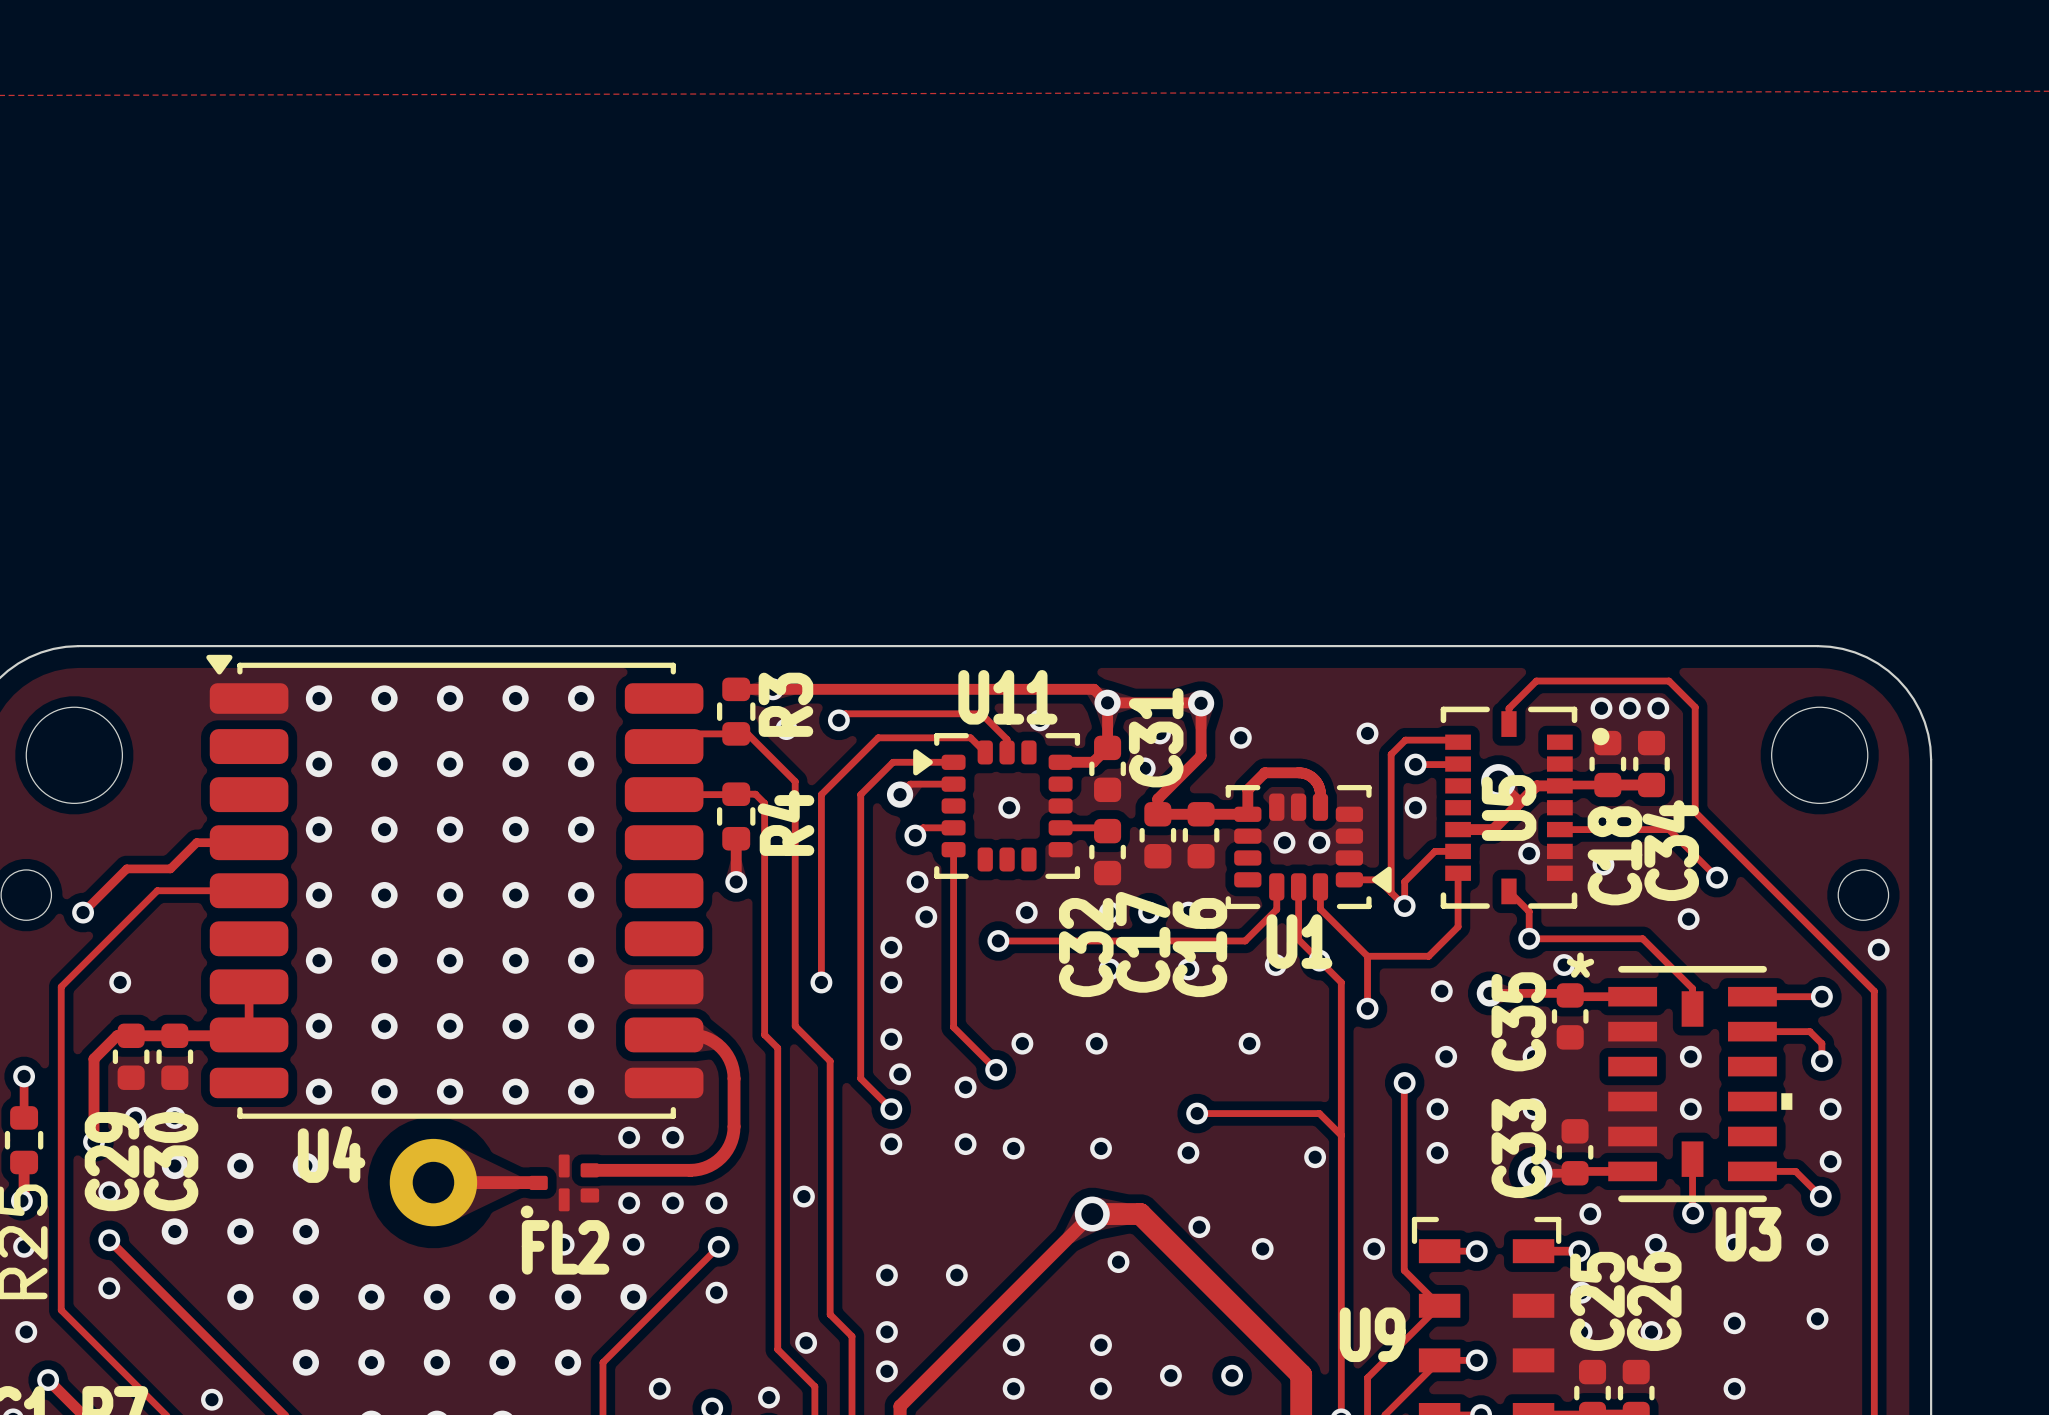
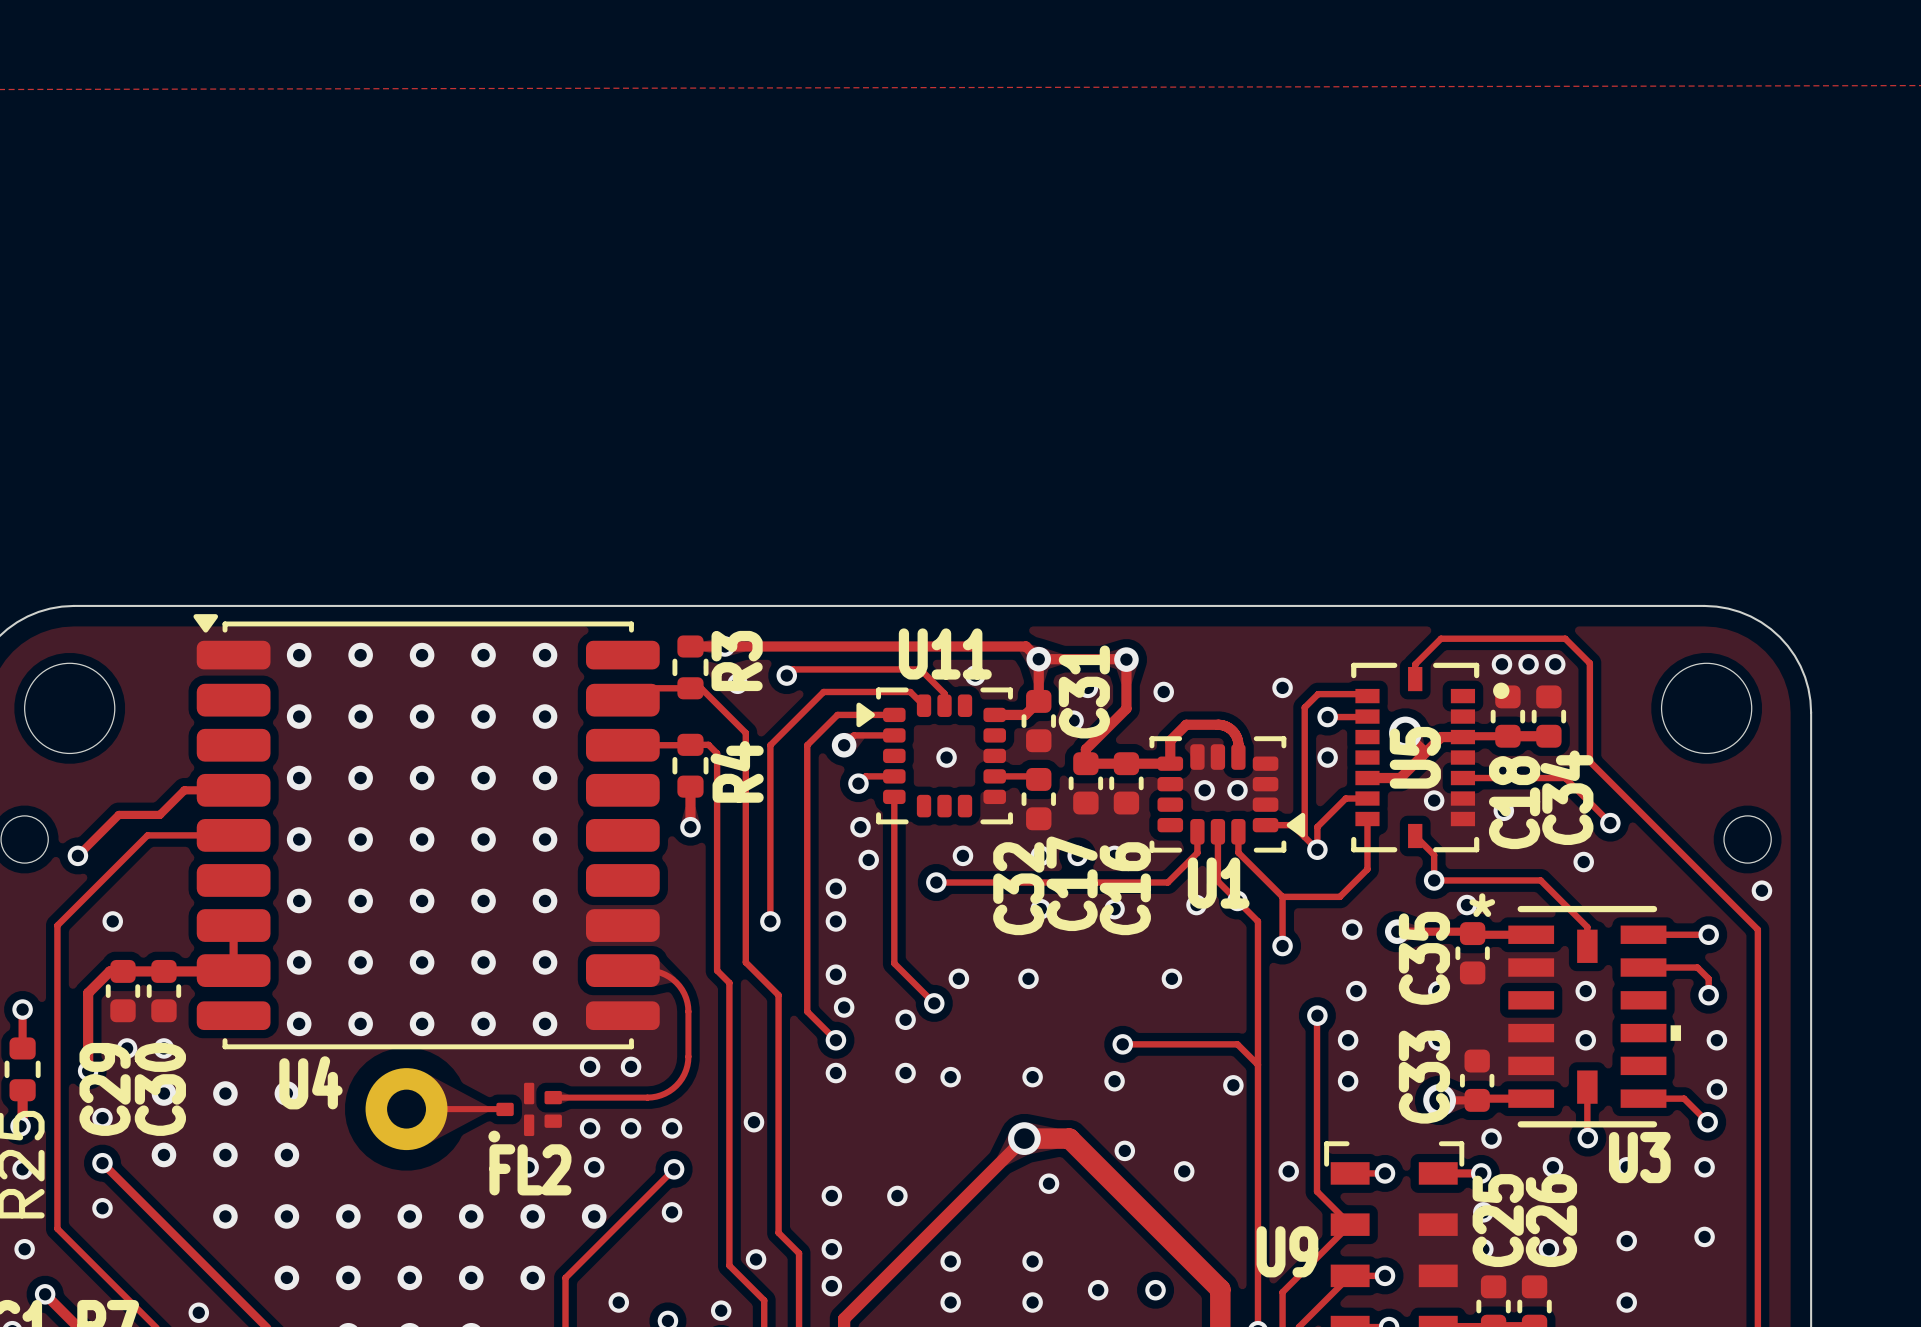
track width: thick (664, 1034) (695, 1035) (704, 1037) (717, 1044) (727, 1055) (731, 1064) (734, 1078) (733, 1131) (729, 1145) (717, 1160) (700, 1169) (589, 1170) -> thin (622, 970) (660, 972) (673, 979) (682, 989) (686, 998) (688, 1011) (688, 1061) (684, 1074) (673, 1088) (656, 1096) (553, 1097)
track width: thick (433, 1182) (538, 1182) -> thin (406, 1109) (504, 1109)

